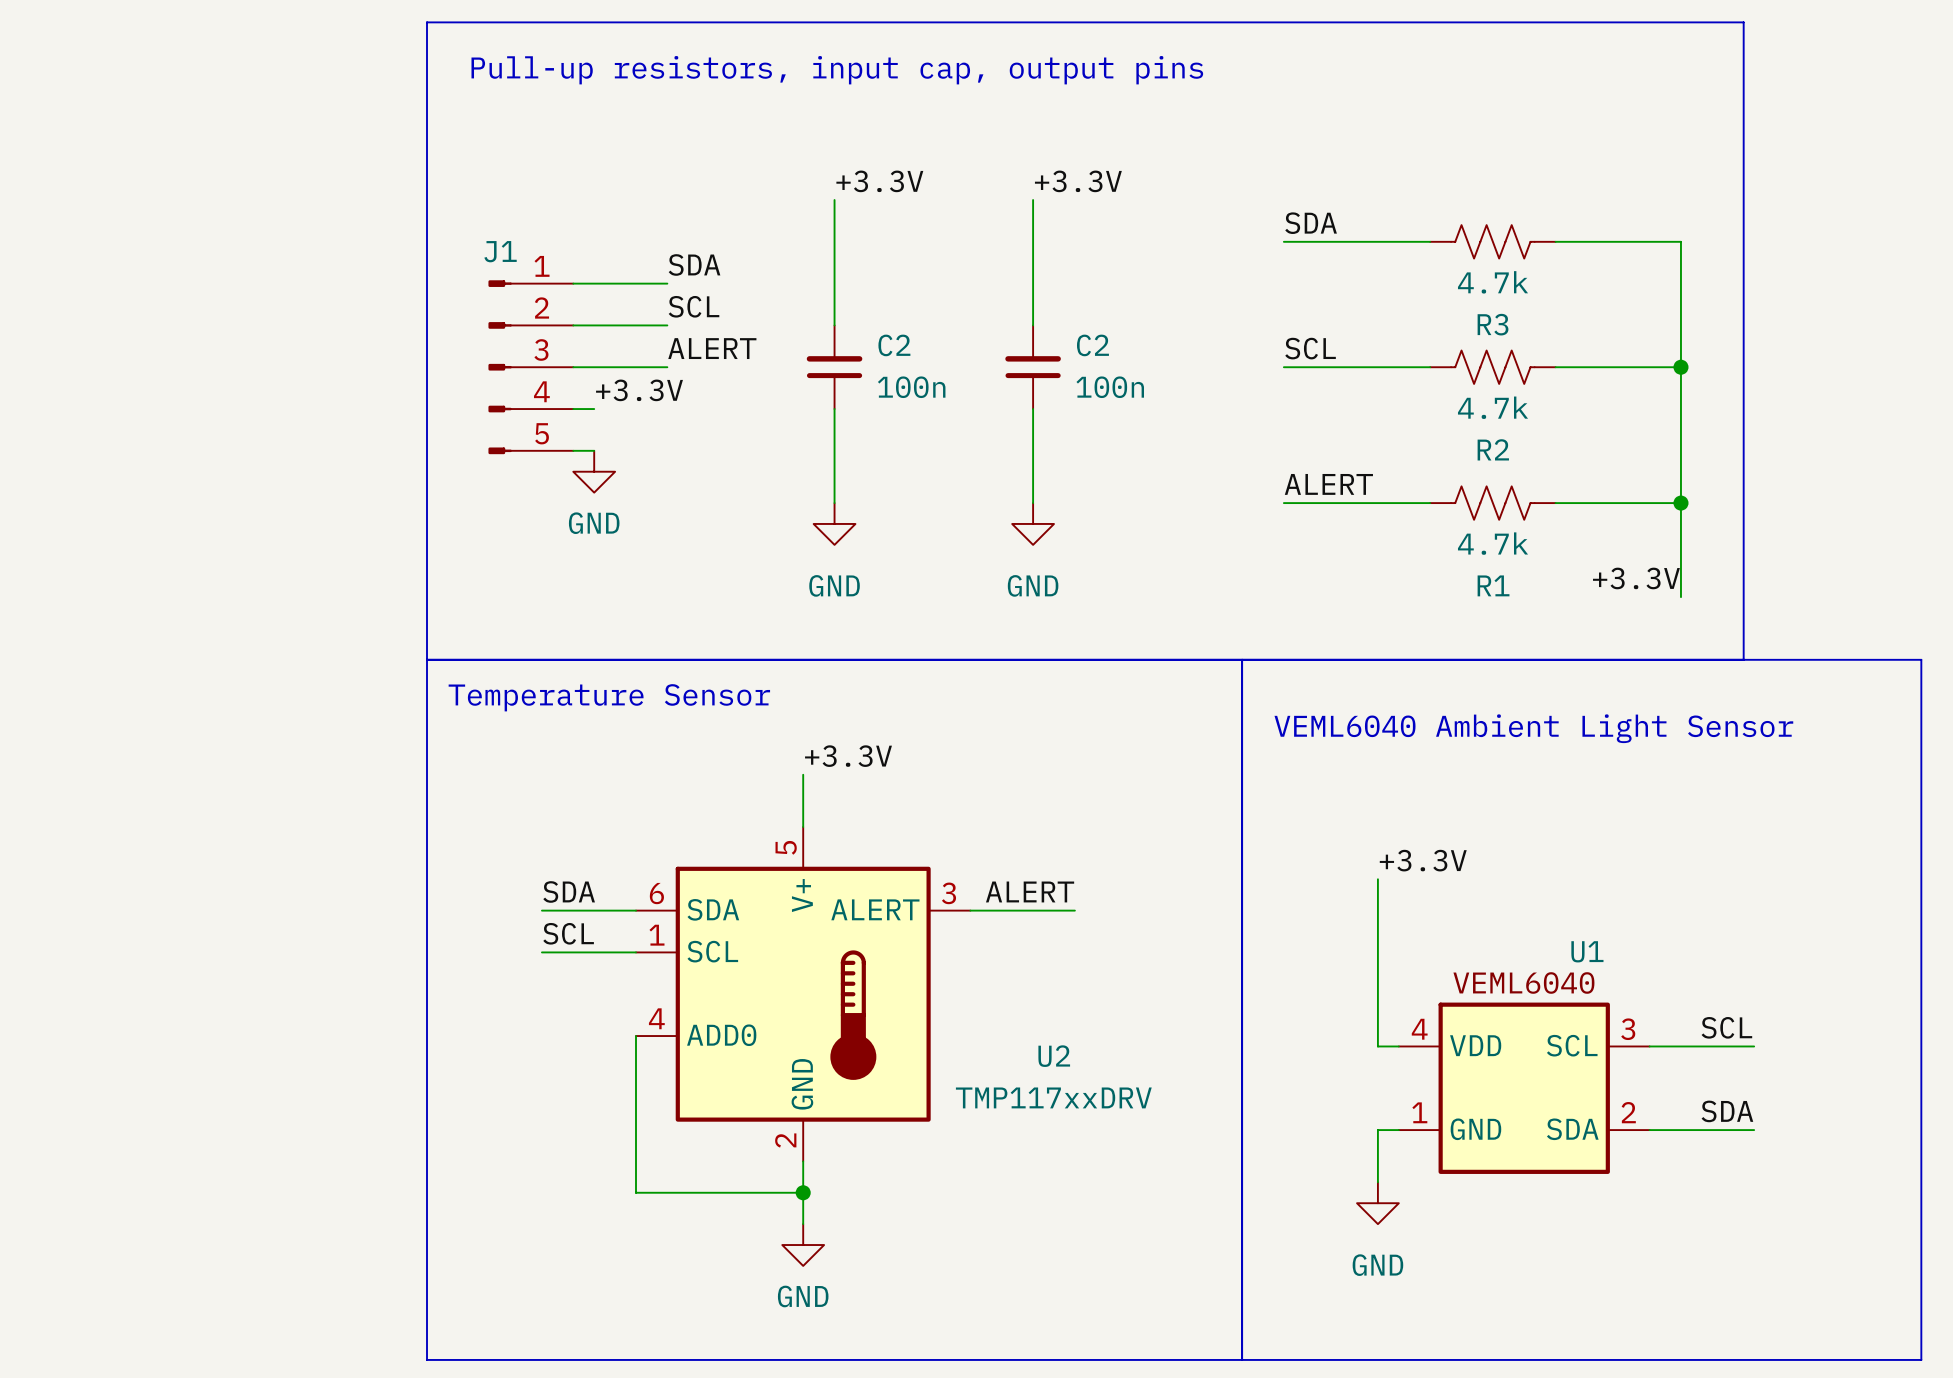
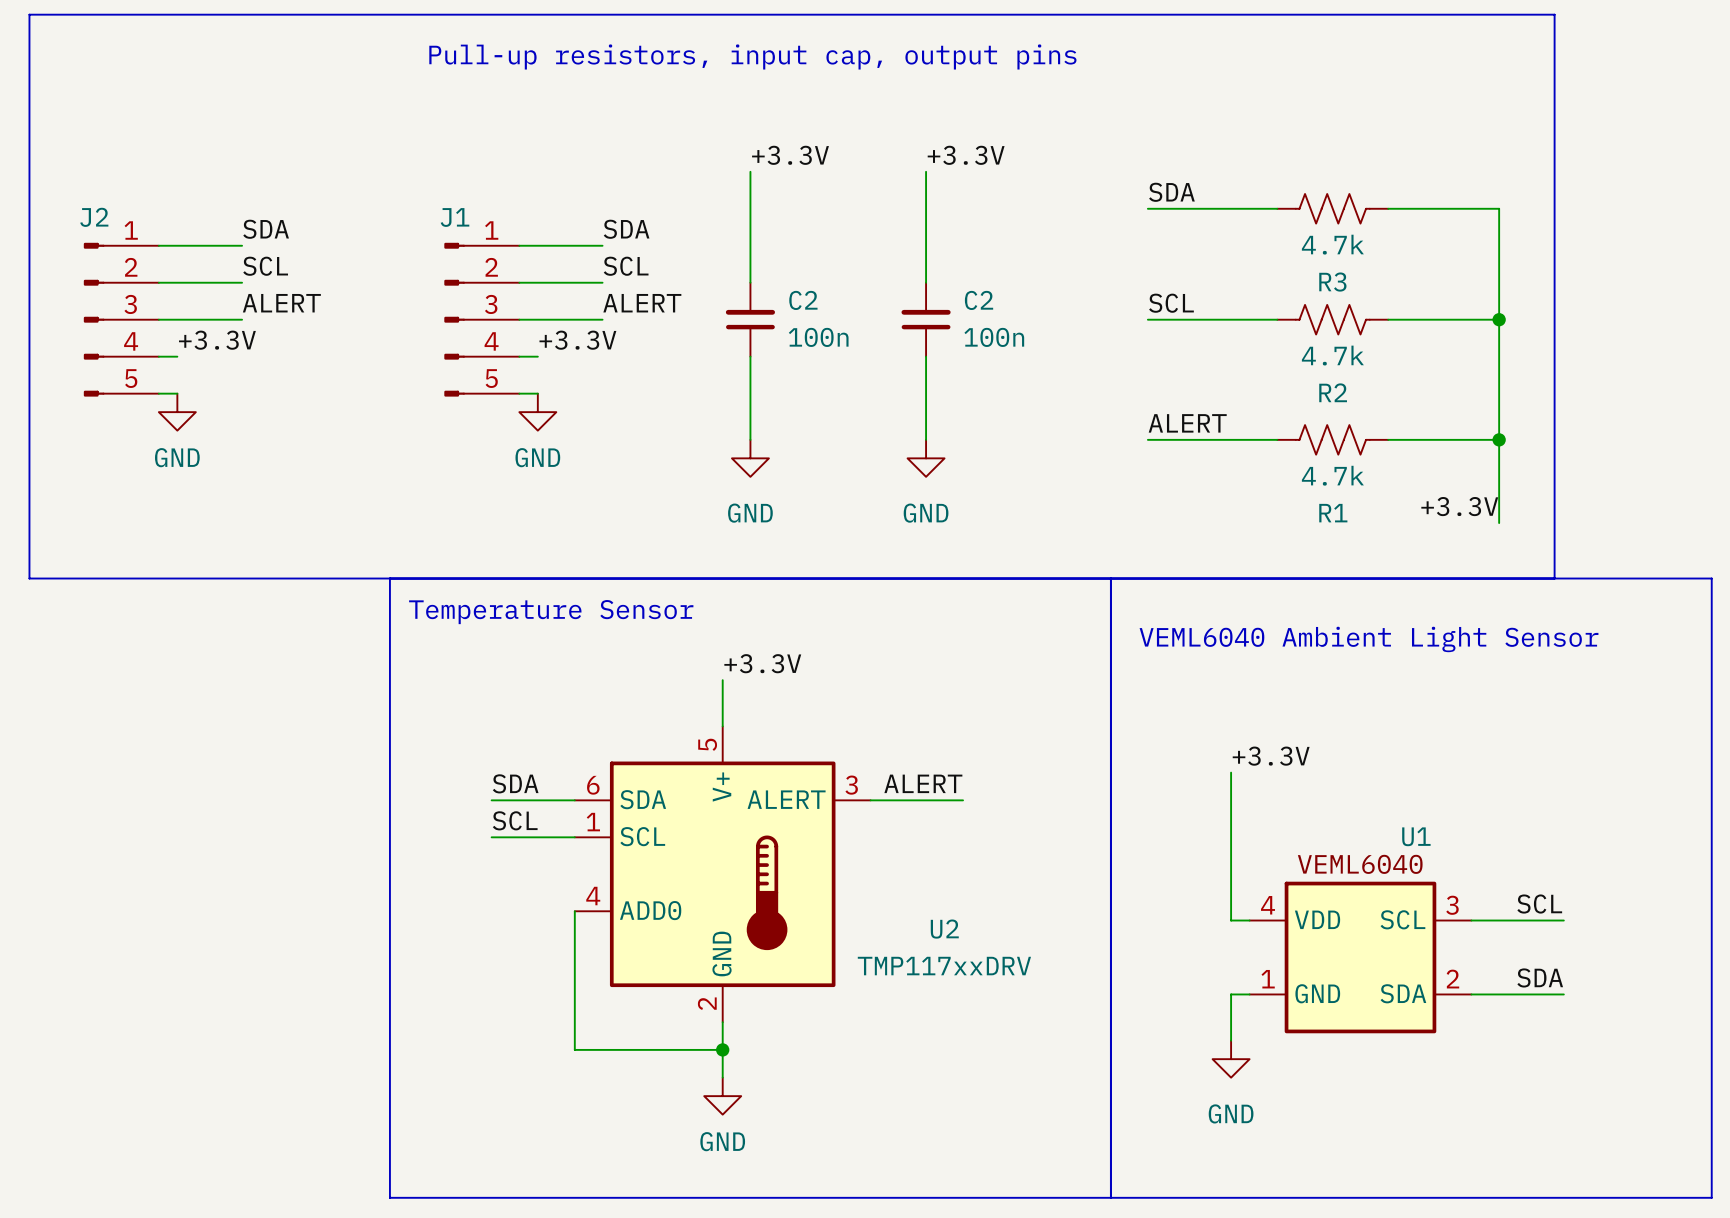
line: (427, 22) (427, 659) -> (389, 14) (29, 14) (29, 578) (389, 578)
label: none -> SDA (266, 229)
wire: none -> (158, 245) (242, 245)
label: none -> SCL (265, 266)
wire: none -> (158, 282) (242, 282)
label: none -> ALERT (281, 303)
J2: none -> (121, 319)
wire: none -> (158, 319) (242, 319)
label: none -> +3.3V (217, 340)
wire: none -> (158, 356) (177, 356)
wire: none -> (158, 393) (177, 393)
power symbol: none -> GND (177, 412)

